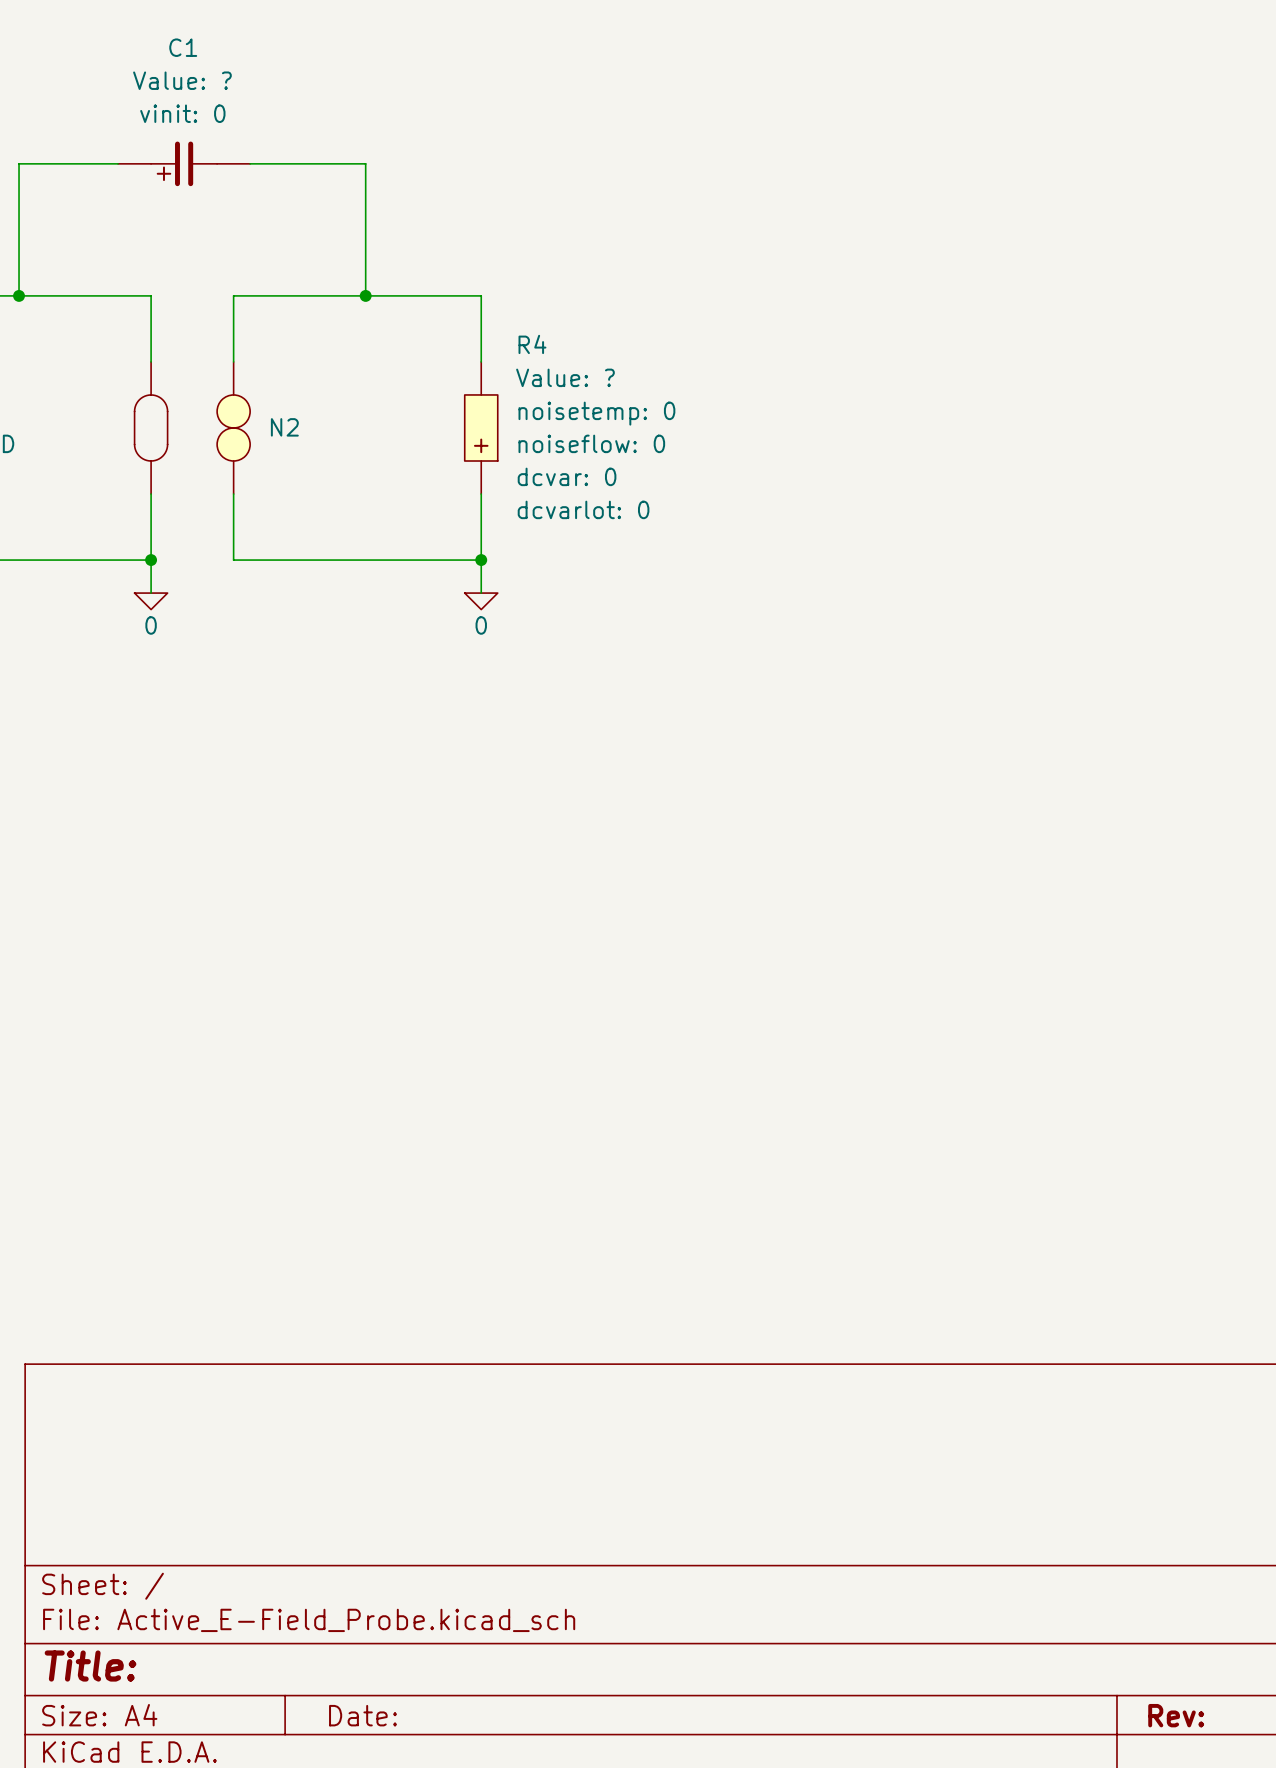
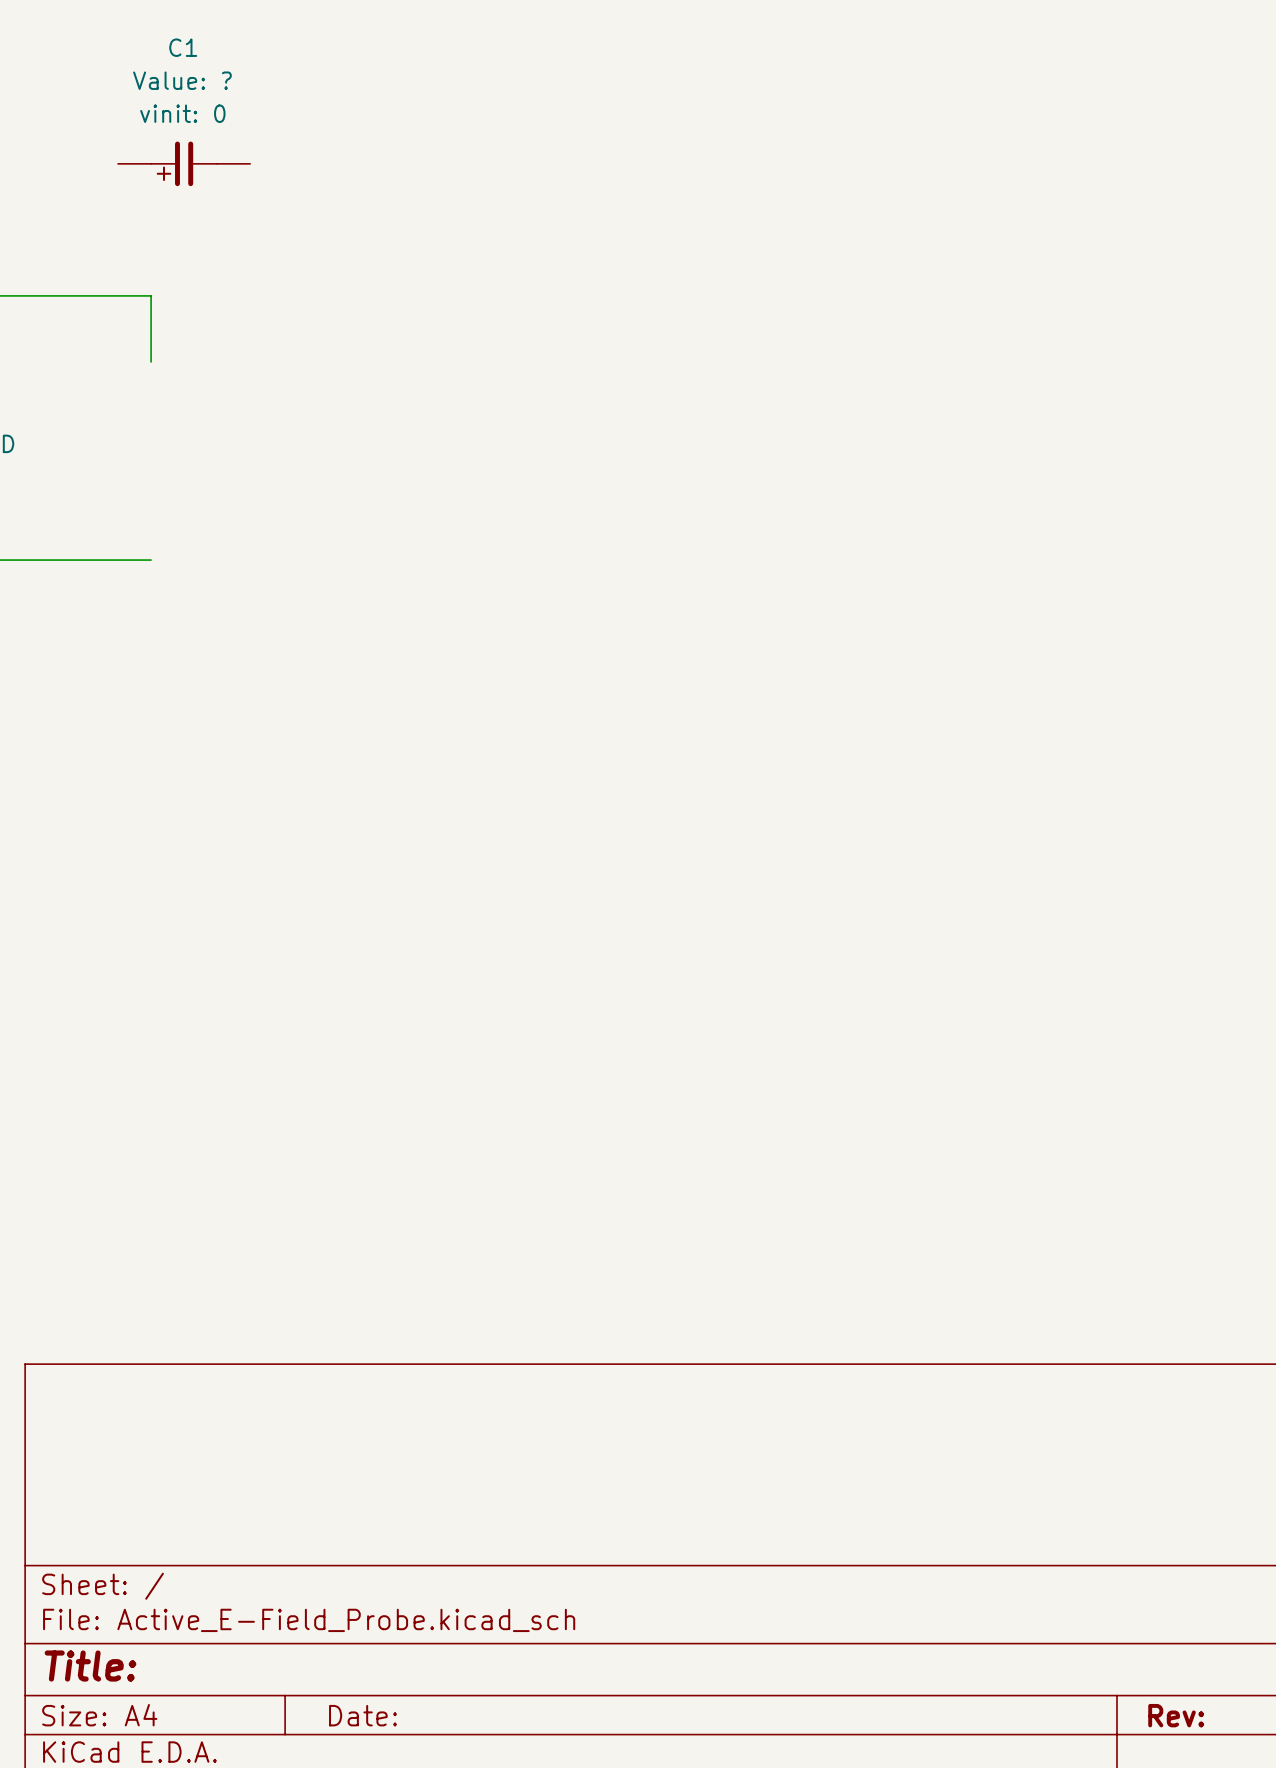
wire: (118, 163) (19, 163) (19, 295) -> none
wire: (250, 163) (365, 163) (365, 295) -> none
junction: (19, 295) -> none
junction: (365, 295) -> none
wire: (233, 361) (233, 295) (481, 295) (481, 361) -> none
N2: (192, 427) -> none
R4: Value: ? (481, 427) -> none
wire: (151, 494) (151, 593) -> none
wire: (233, 494) (233, 560) (481, 560) -> none
wire: (481, 494) (481, 593) -> none
junction: (151, 560) -> none
junction: (481, 560) -> none
power symbol: 0 (151, 601) -> none
power symbol: 0 (481, 601) -> none

